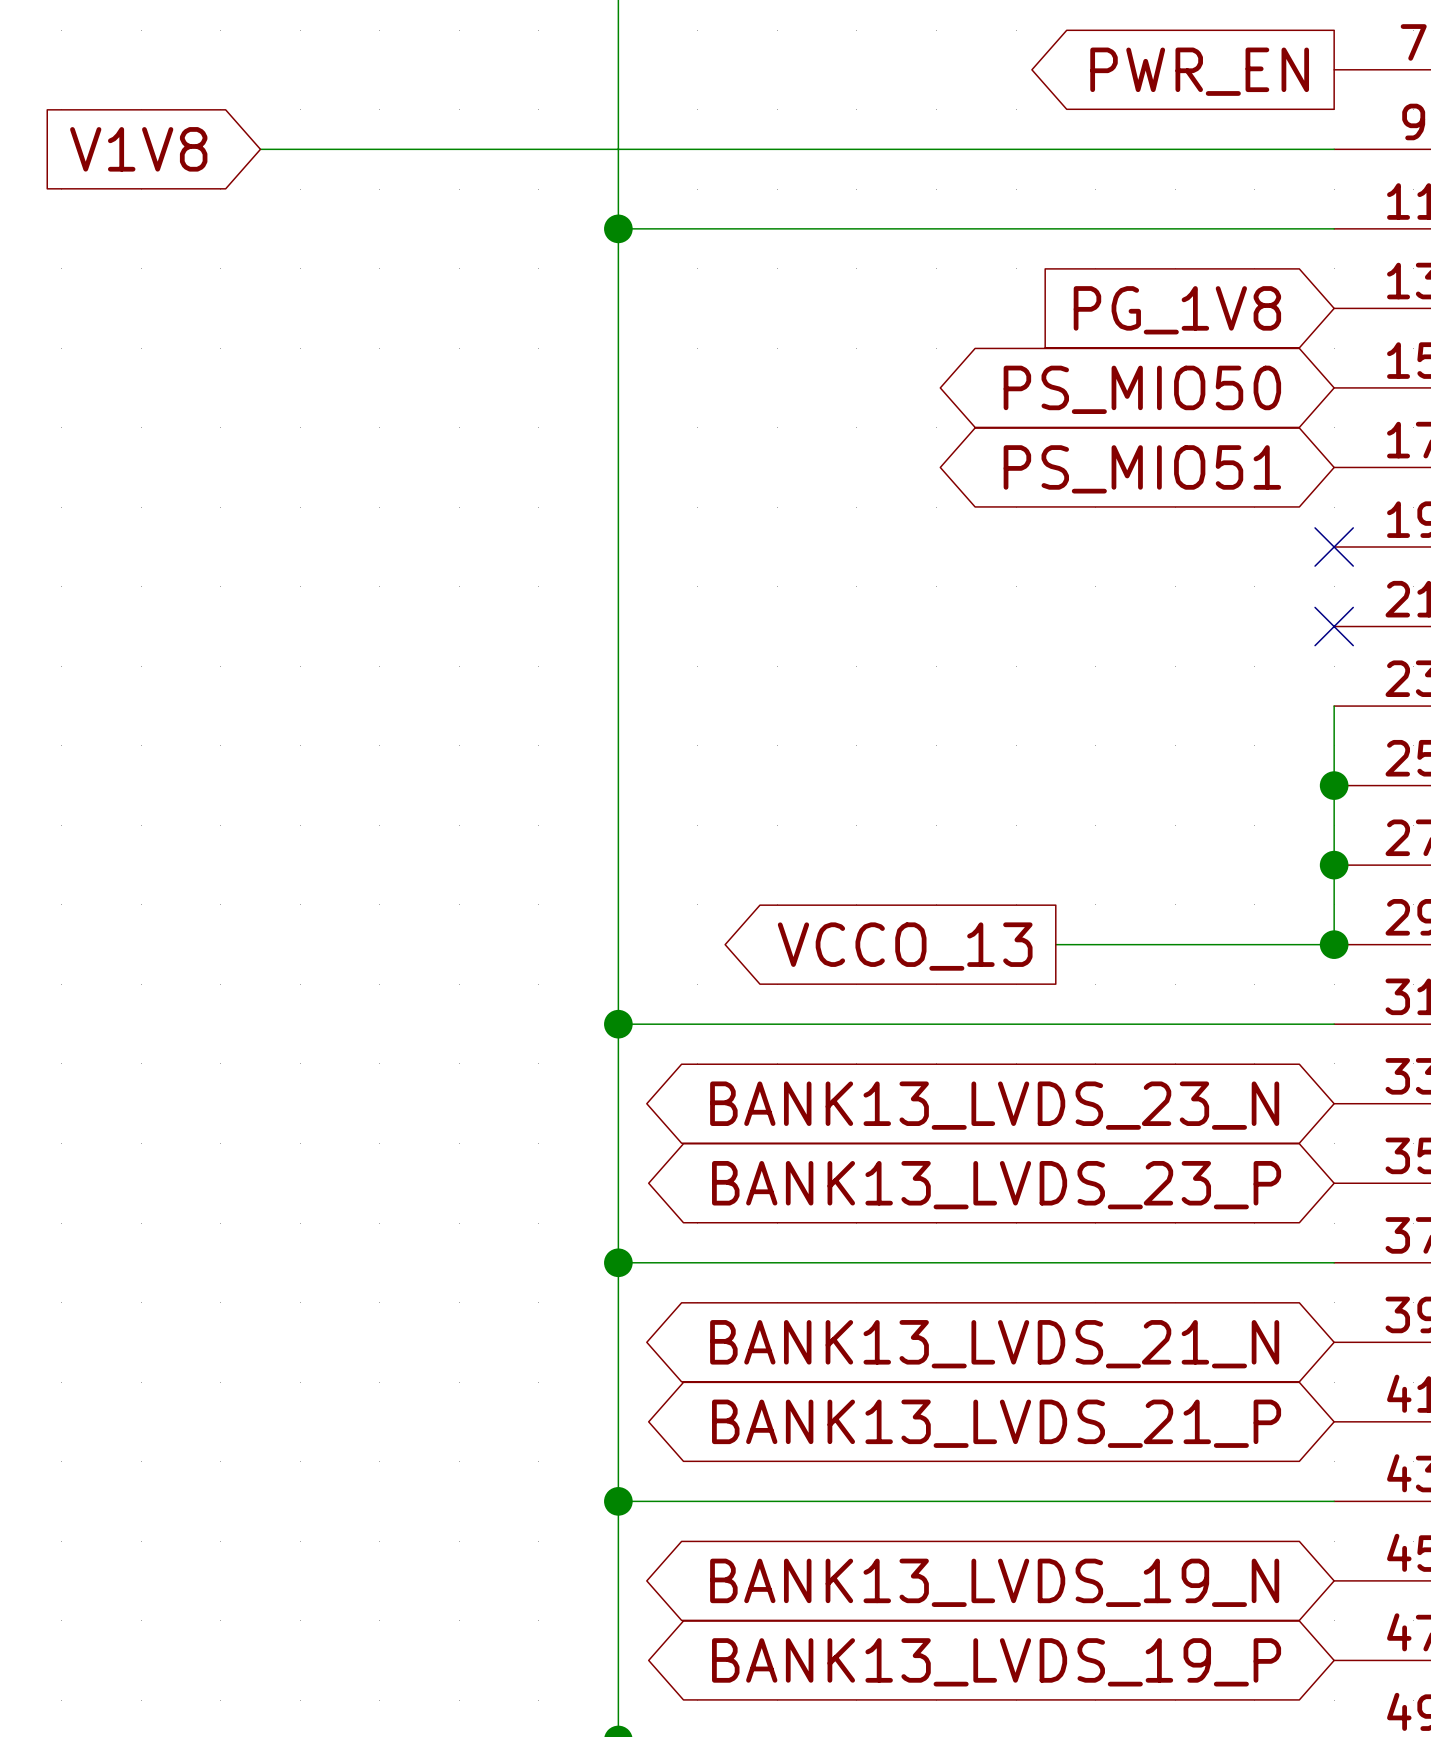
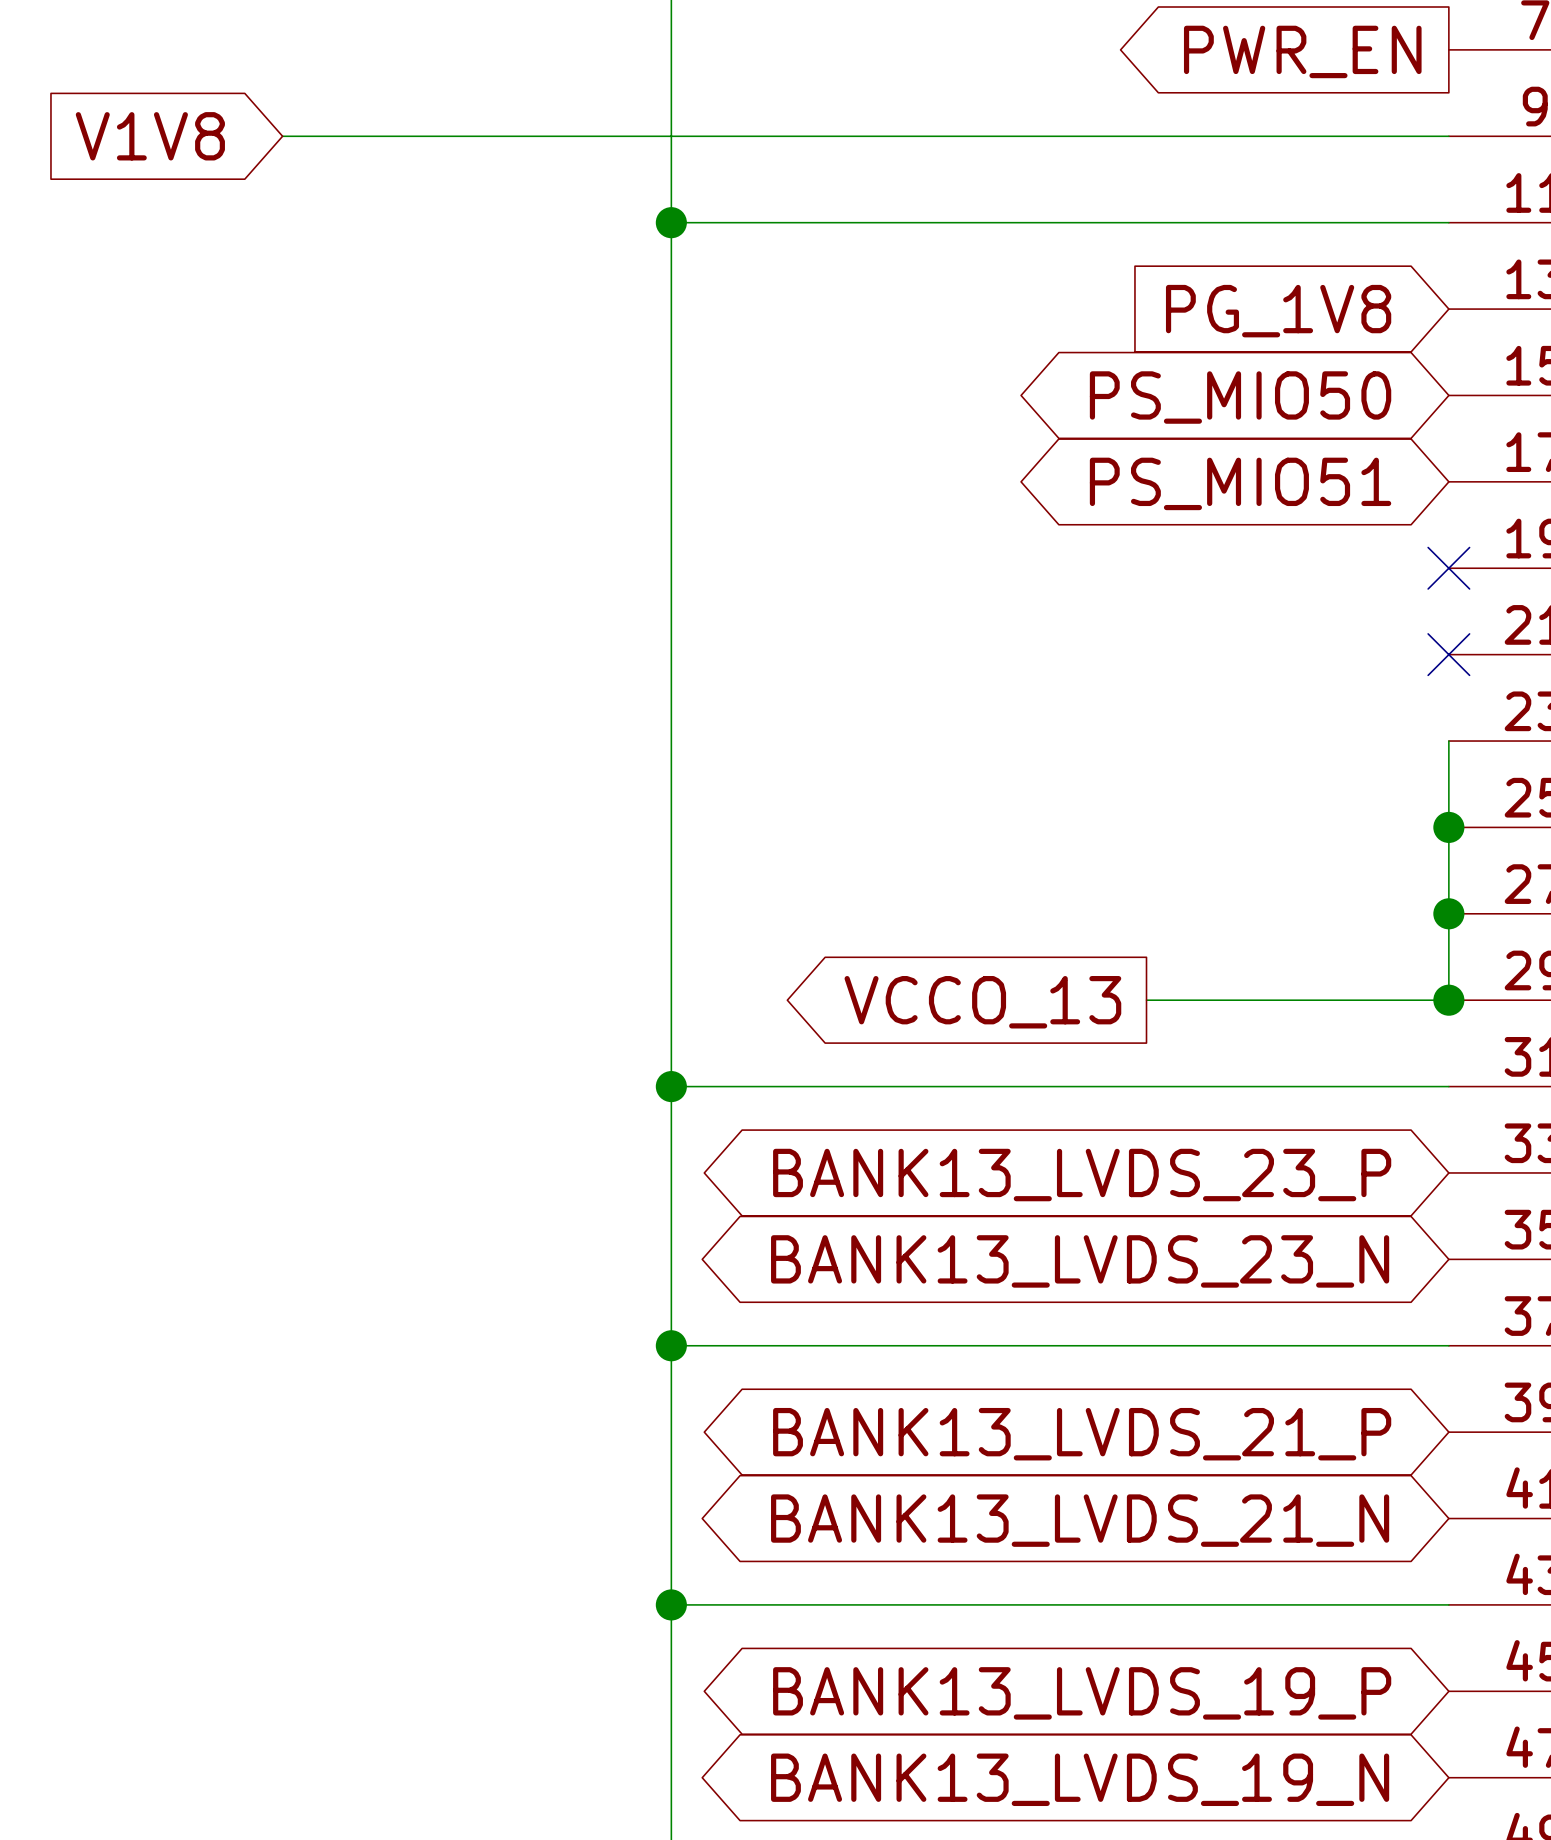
global label: BANK13_LVDS_23_N (994, 1105) -> BANK13_LVDS_23_P (1082, 1175)
global label: BANK13_LVDS_23_P (996, 1185) -> BANK13_LVDS_23_N (1080, 1261)
global label: BANK13_LVDS_21_N (994, 1344) -> BANK13_LVDS_21_P (1082, 1434)
global label: BANK13_LVDS_21_P (996, 1423) -> BANK13_LVDS_21_N (1080, 1520)
global label: BANK13_LVDS_19_N (994, 1582) -> BANK13_LVDS_19_P (1082, 1693)
global label: BANK13_LVDS_19_P (996, 1662) -> BANK13_LVDS_19_N (1080, 1779)

